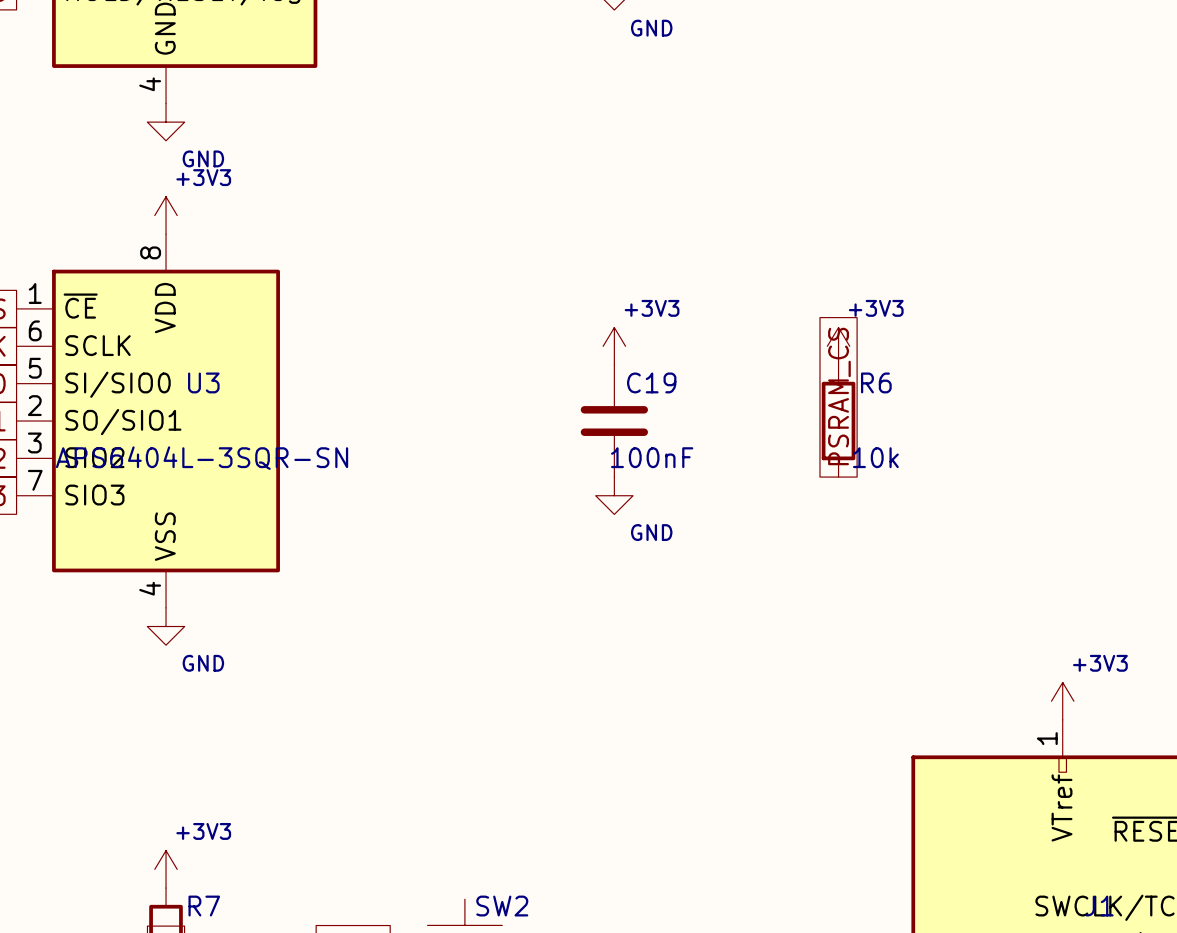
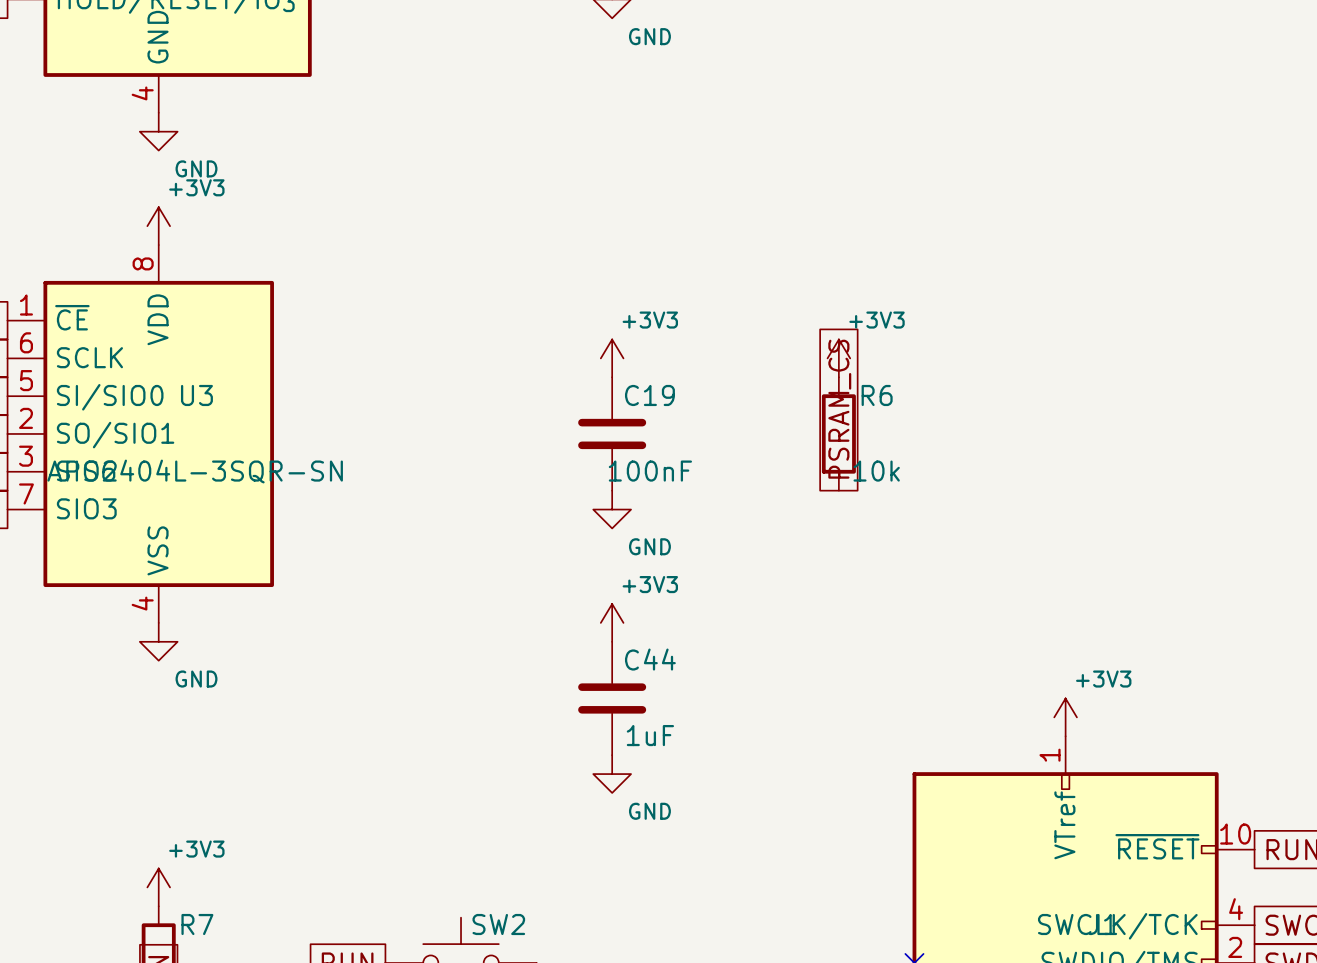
power symbol: none -> +3V3 (612, 622)
C44: none -> 1uF (612, 698)
power symbol: none -> GND (612, 774)

